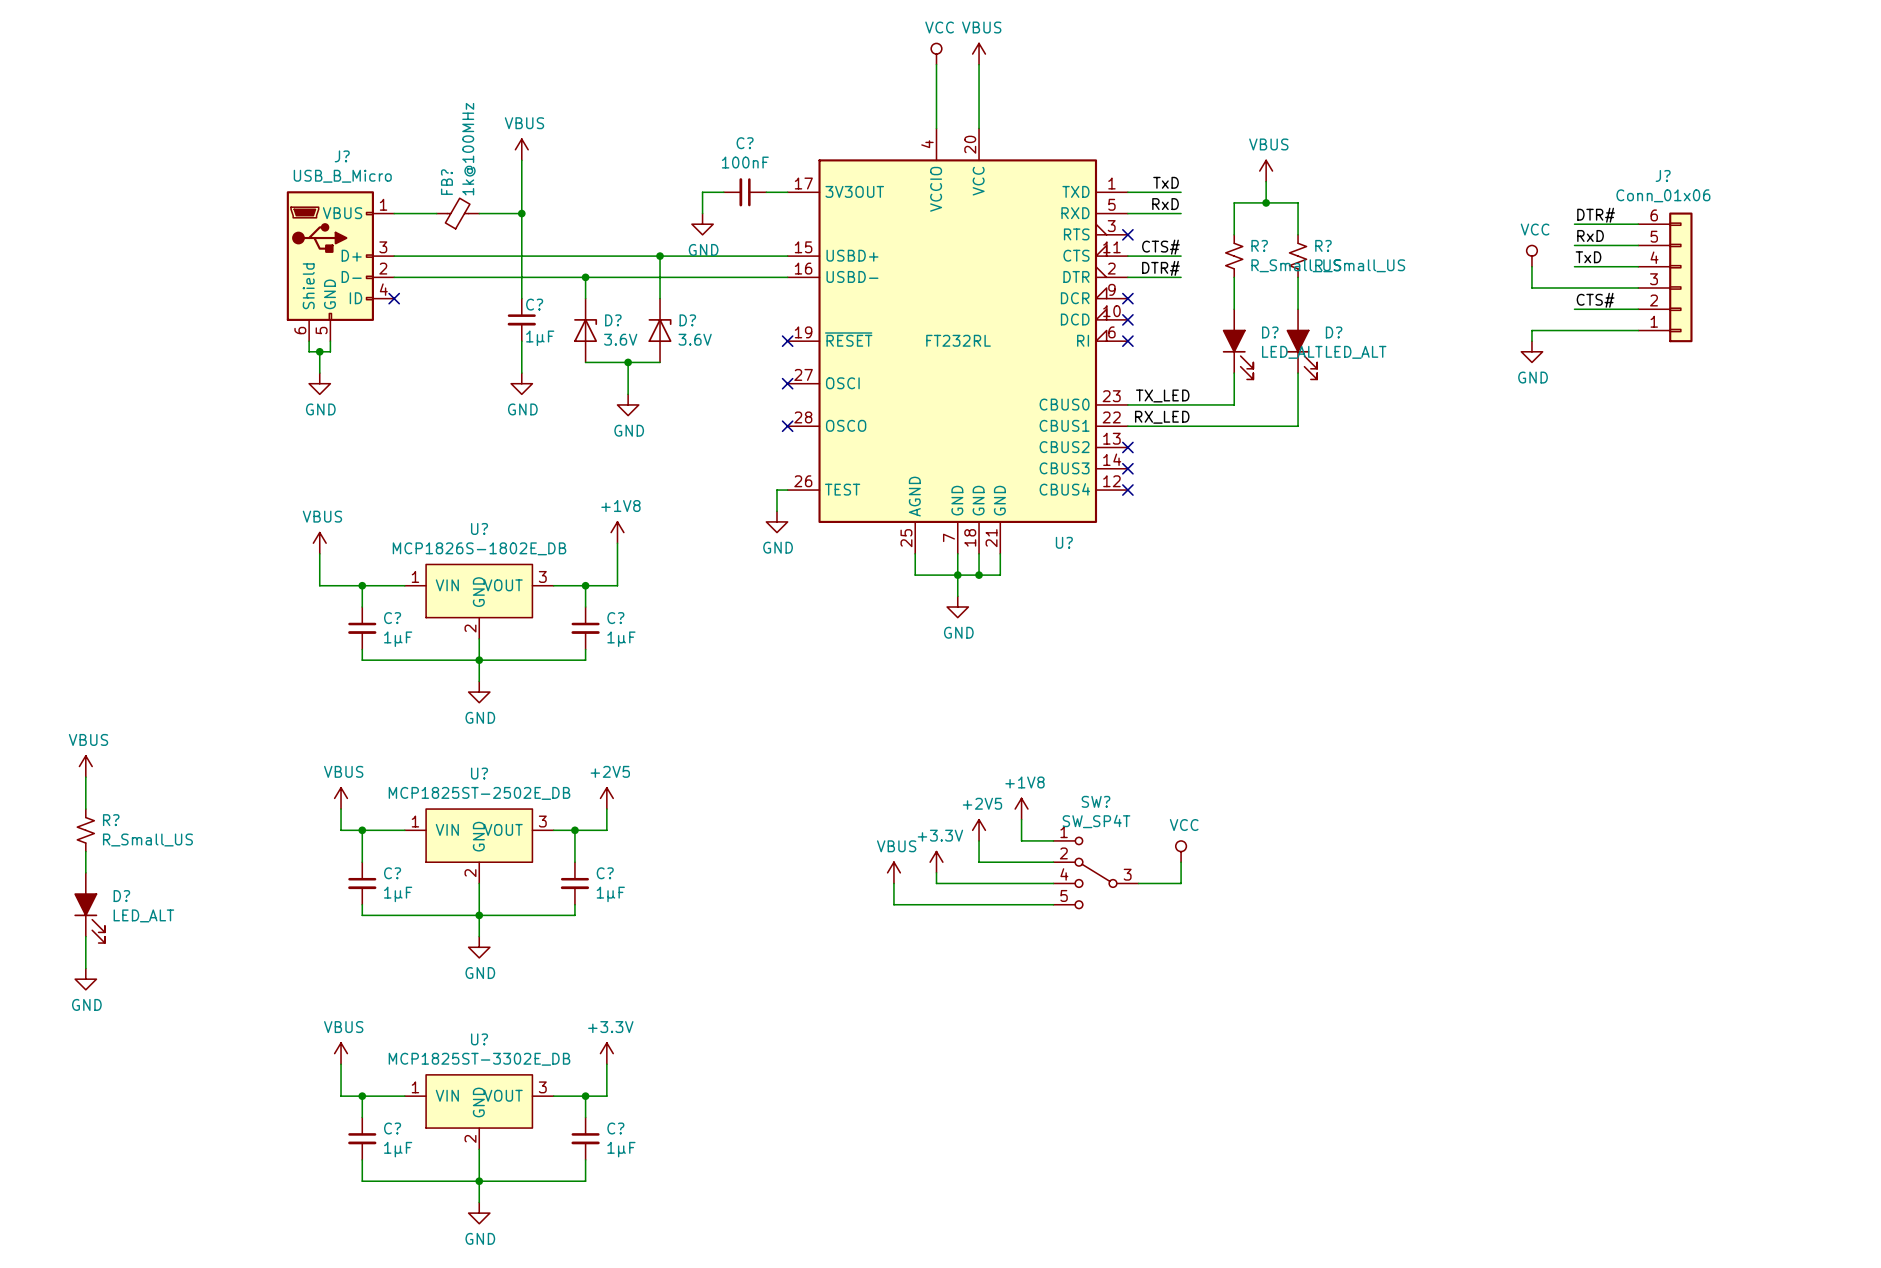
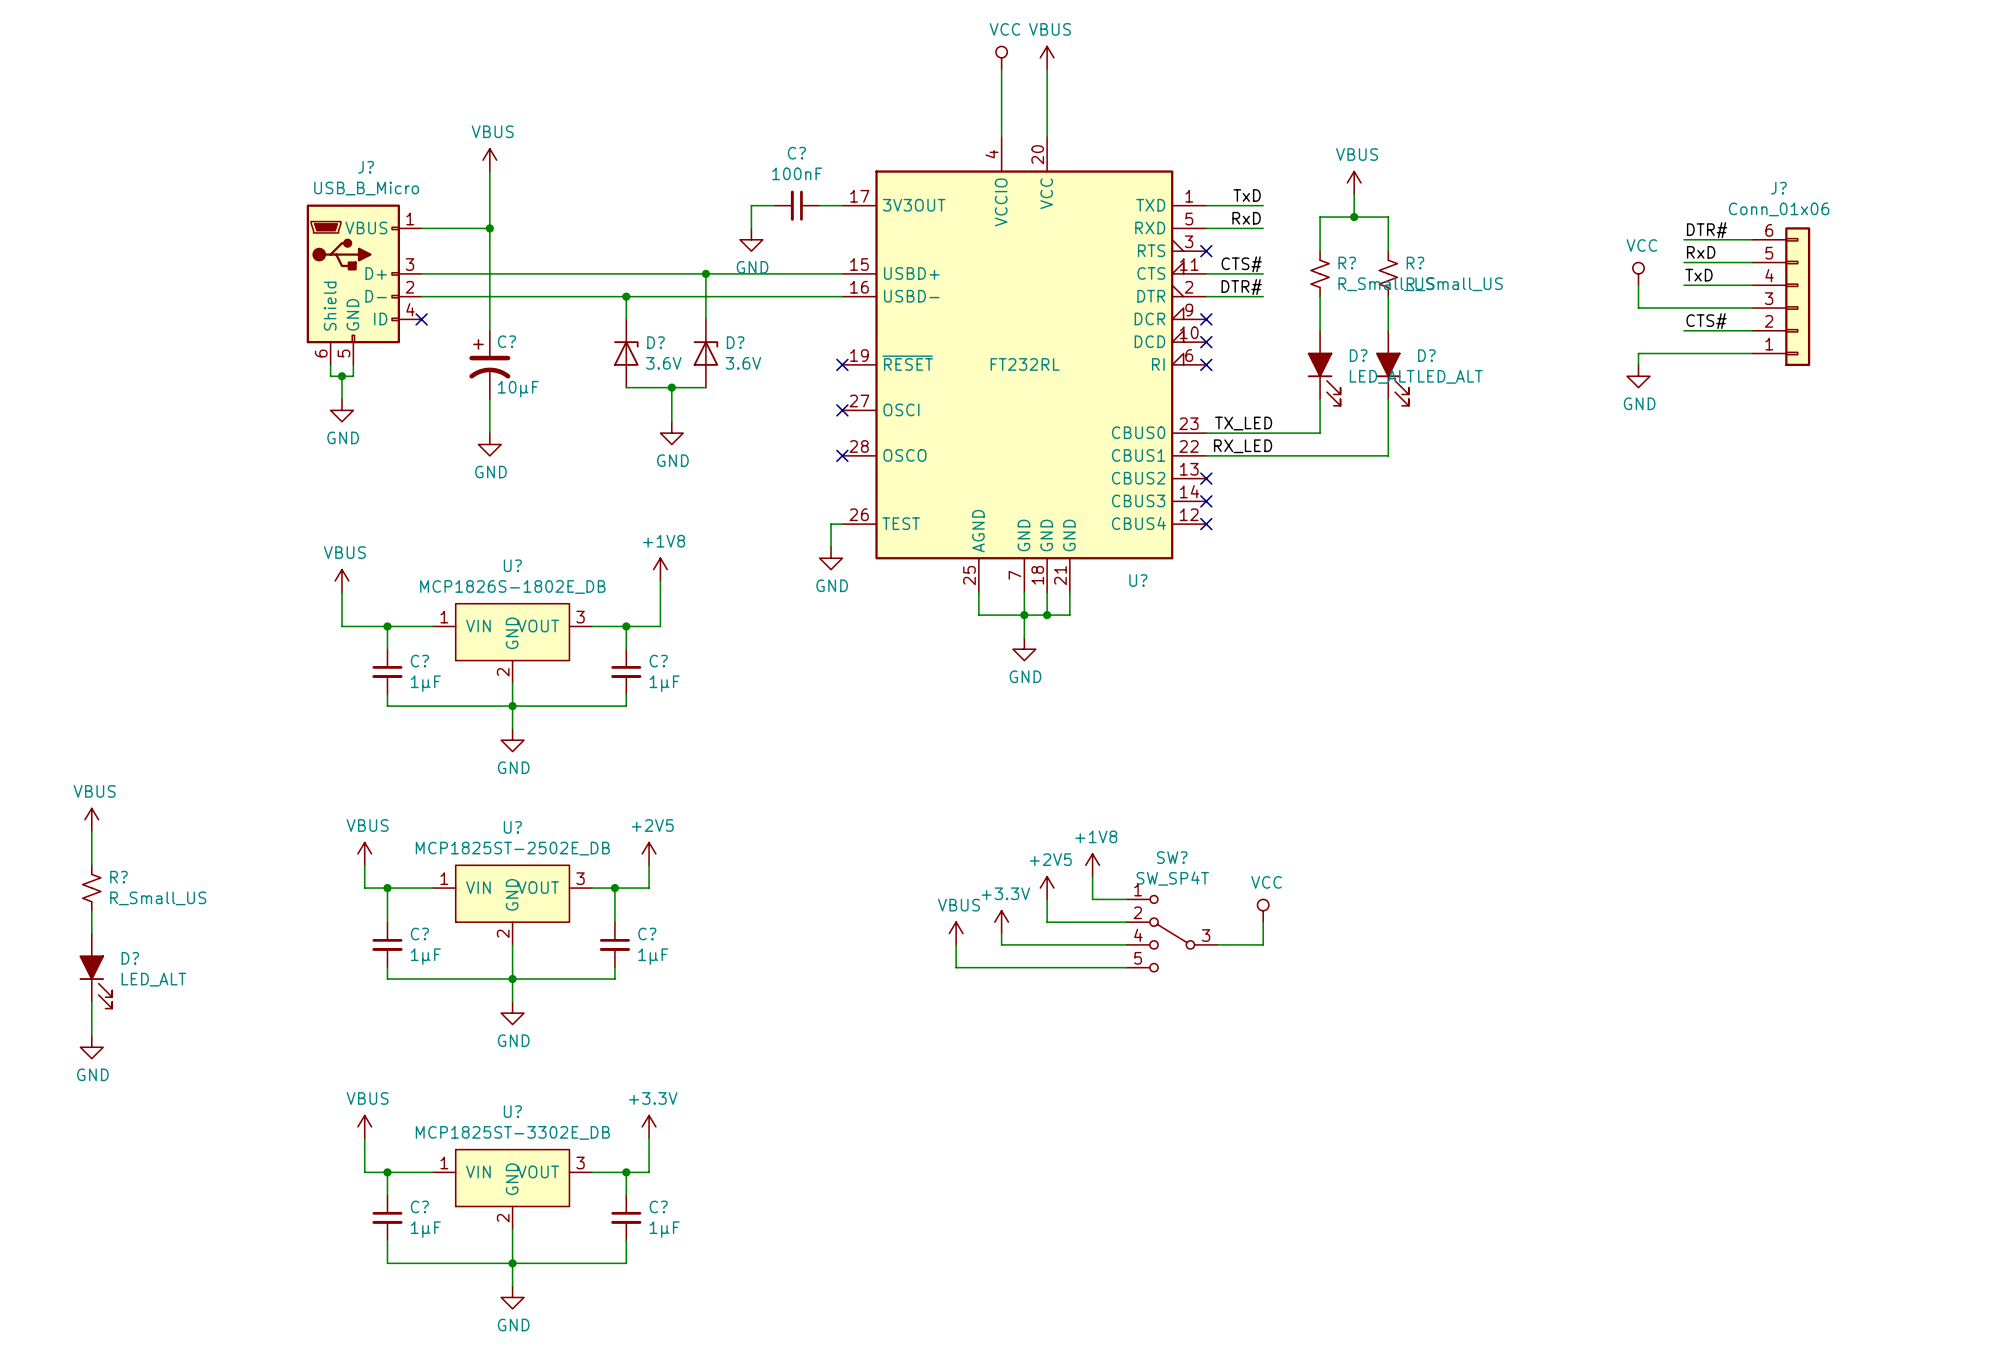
power symbol position: VBUS (521, 149) -> VBUS (489, 160)
wire: none -> (489, 171) (489, 330)
wire: (521, 160) (521, 298) -> none
FB?: 1k@100MHz (457, 213) -> none
junction: none -> (489, 228)
wire: (479, 213) (521, 213) -> none
junction: (521, 213) -> none
C?: 1µF (521, 319) -> none
C?: none -> 10µF (489, 364)
wire: (521, 341) (521, 373) -> (489, 399) (489, 433)
power symbol position: GND (521, 383) -> GND (489, 444)

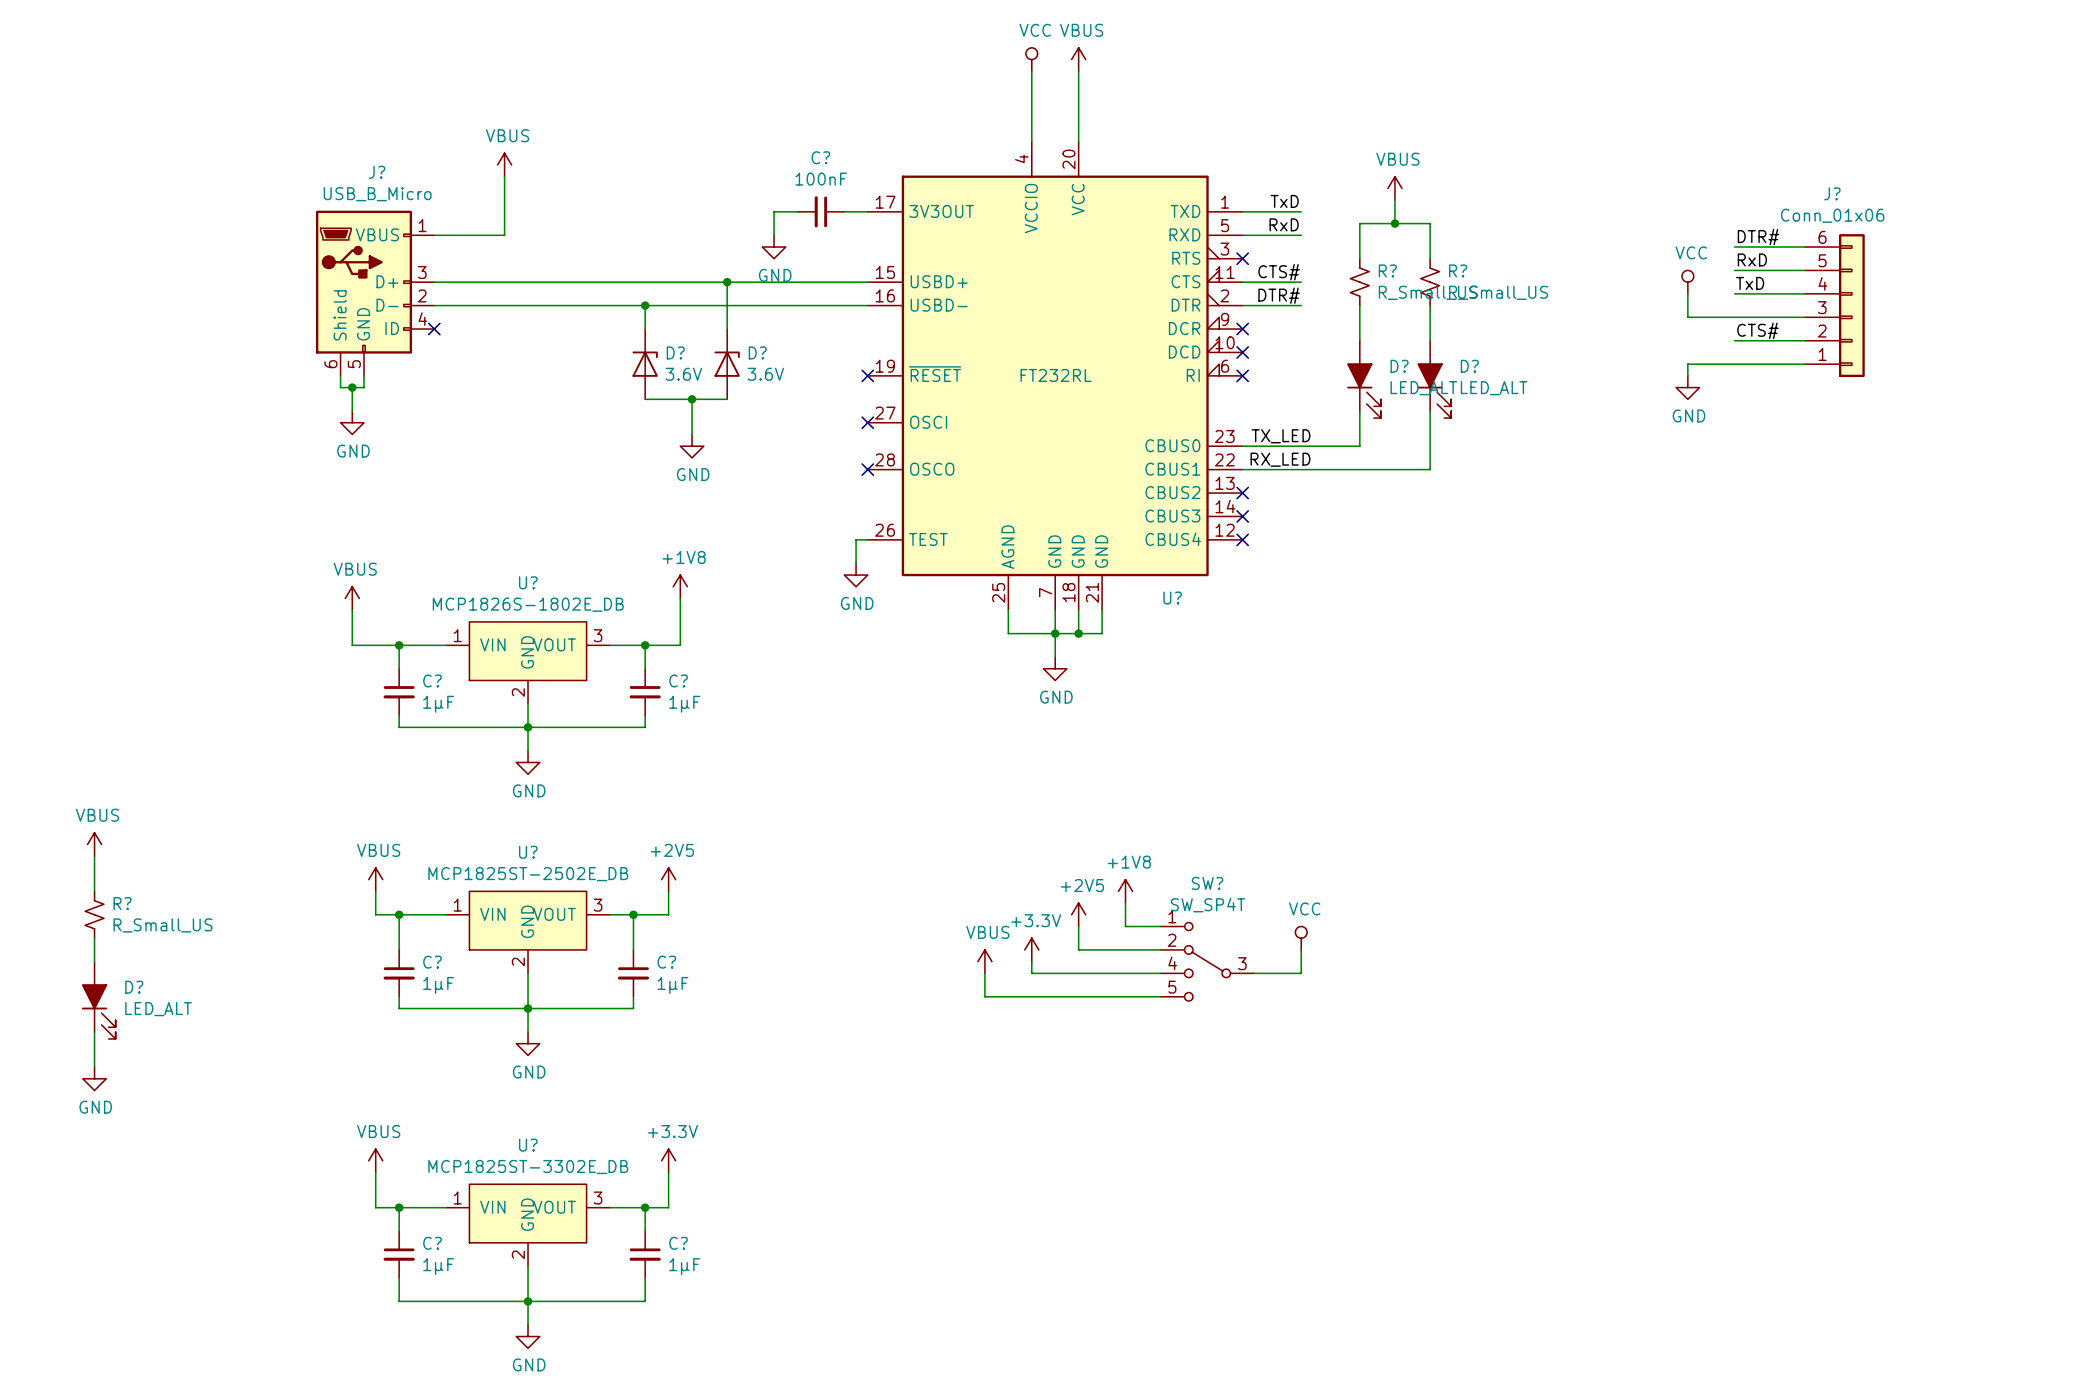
wire: (489, 228) (489, 330) -> none
junction: (489, 228) -> none
C?: 10µF (489, 364) -> none
wire: (489, 399) (489, 433) -> none
power symbol: GND (489, 444) -> none

